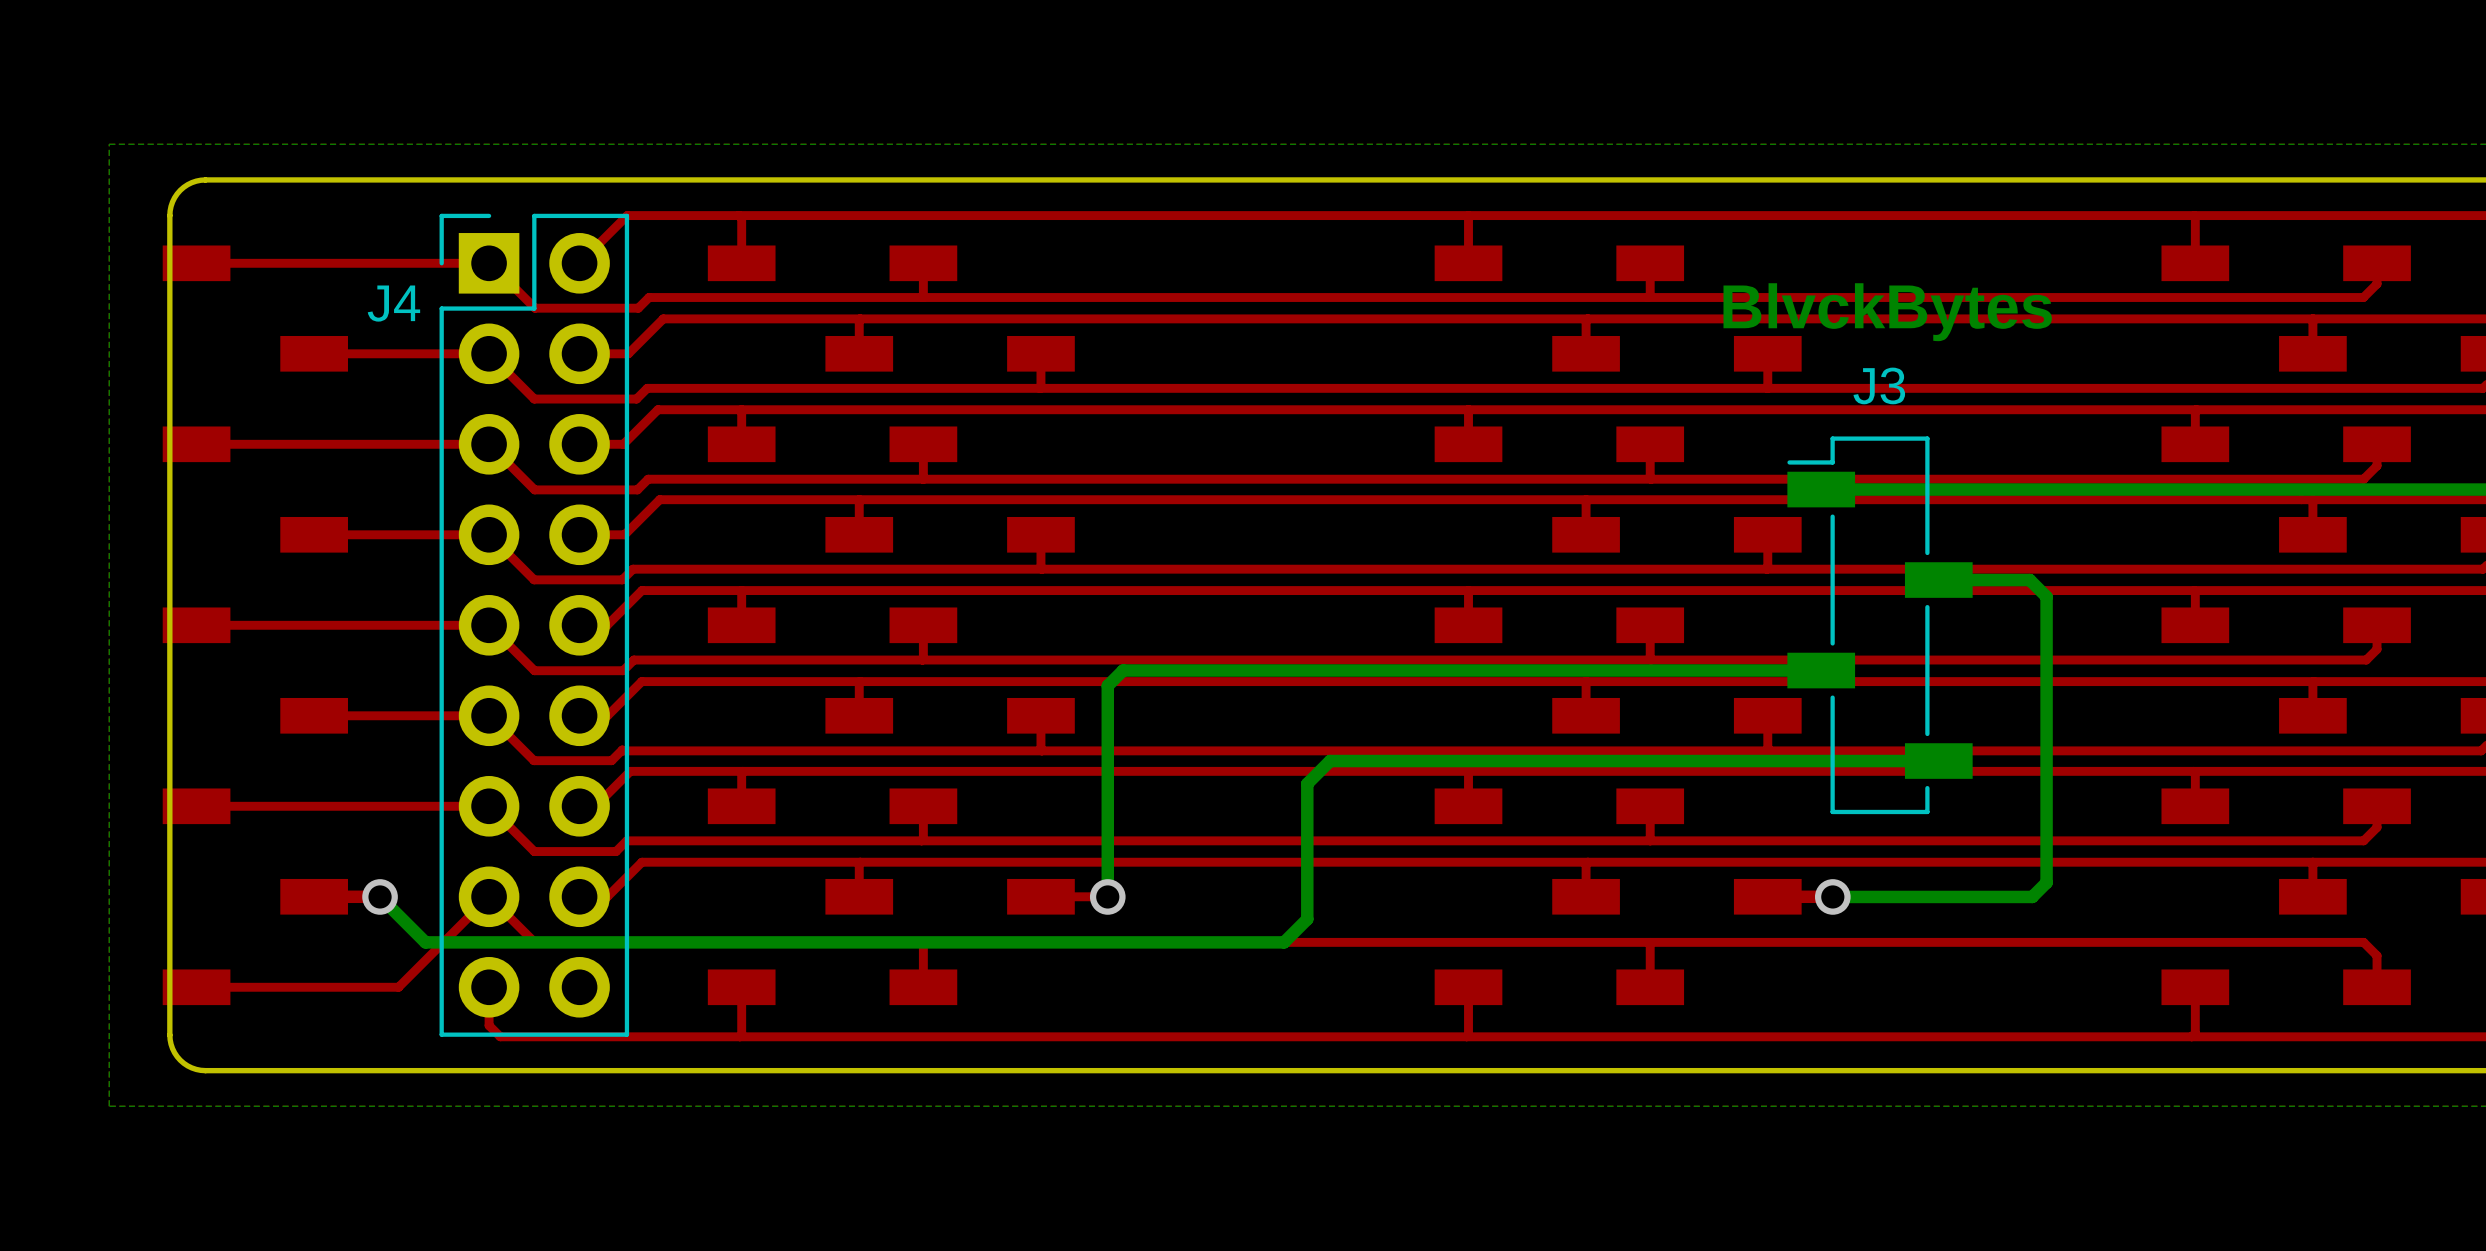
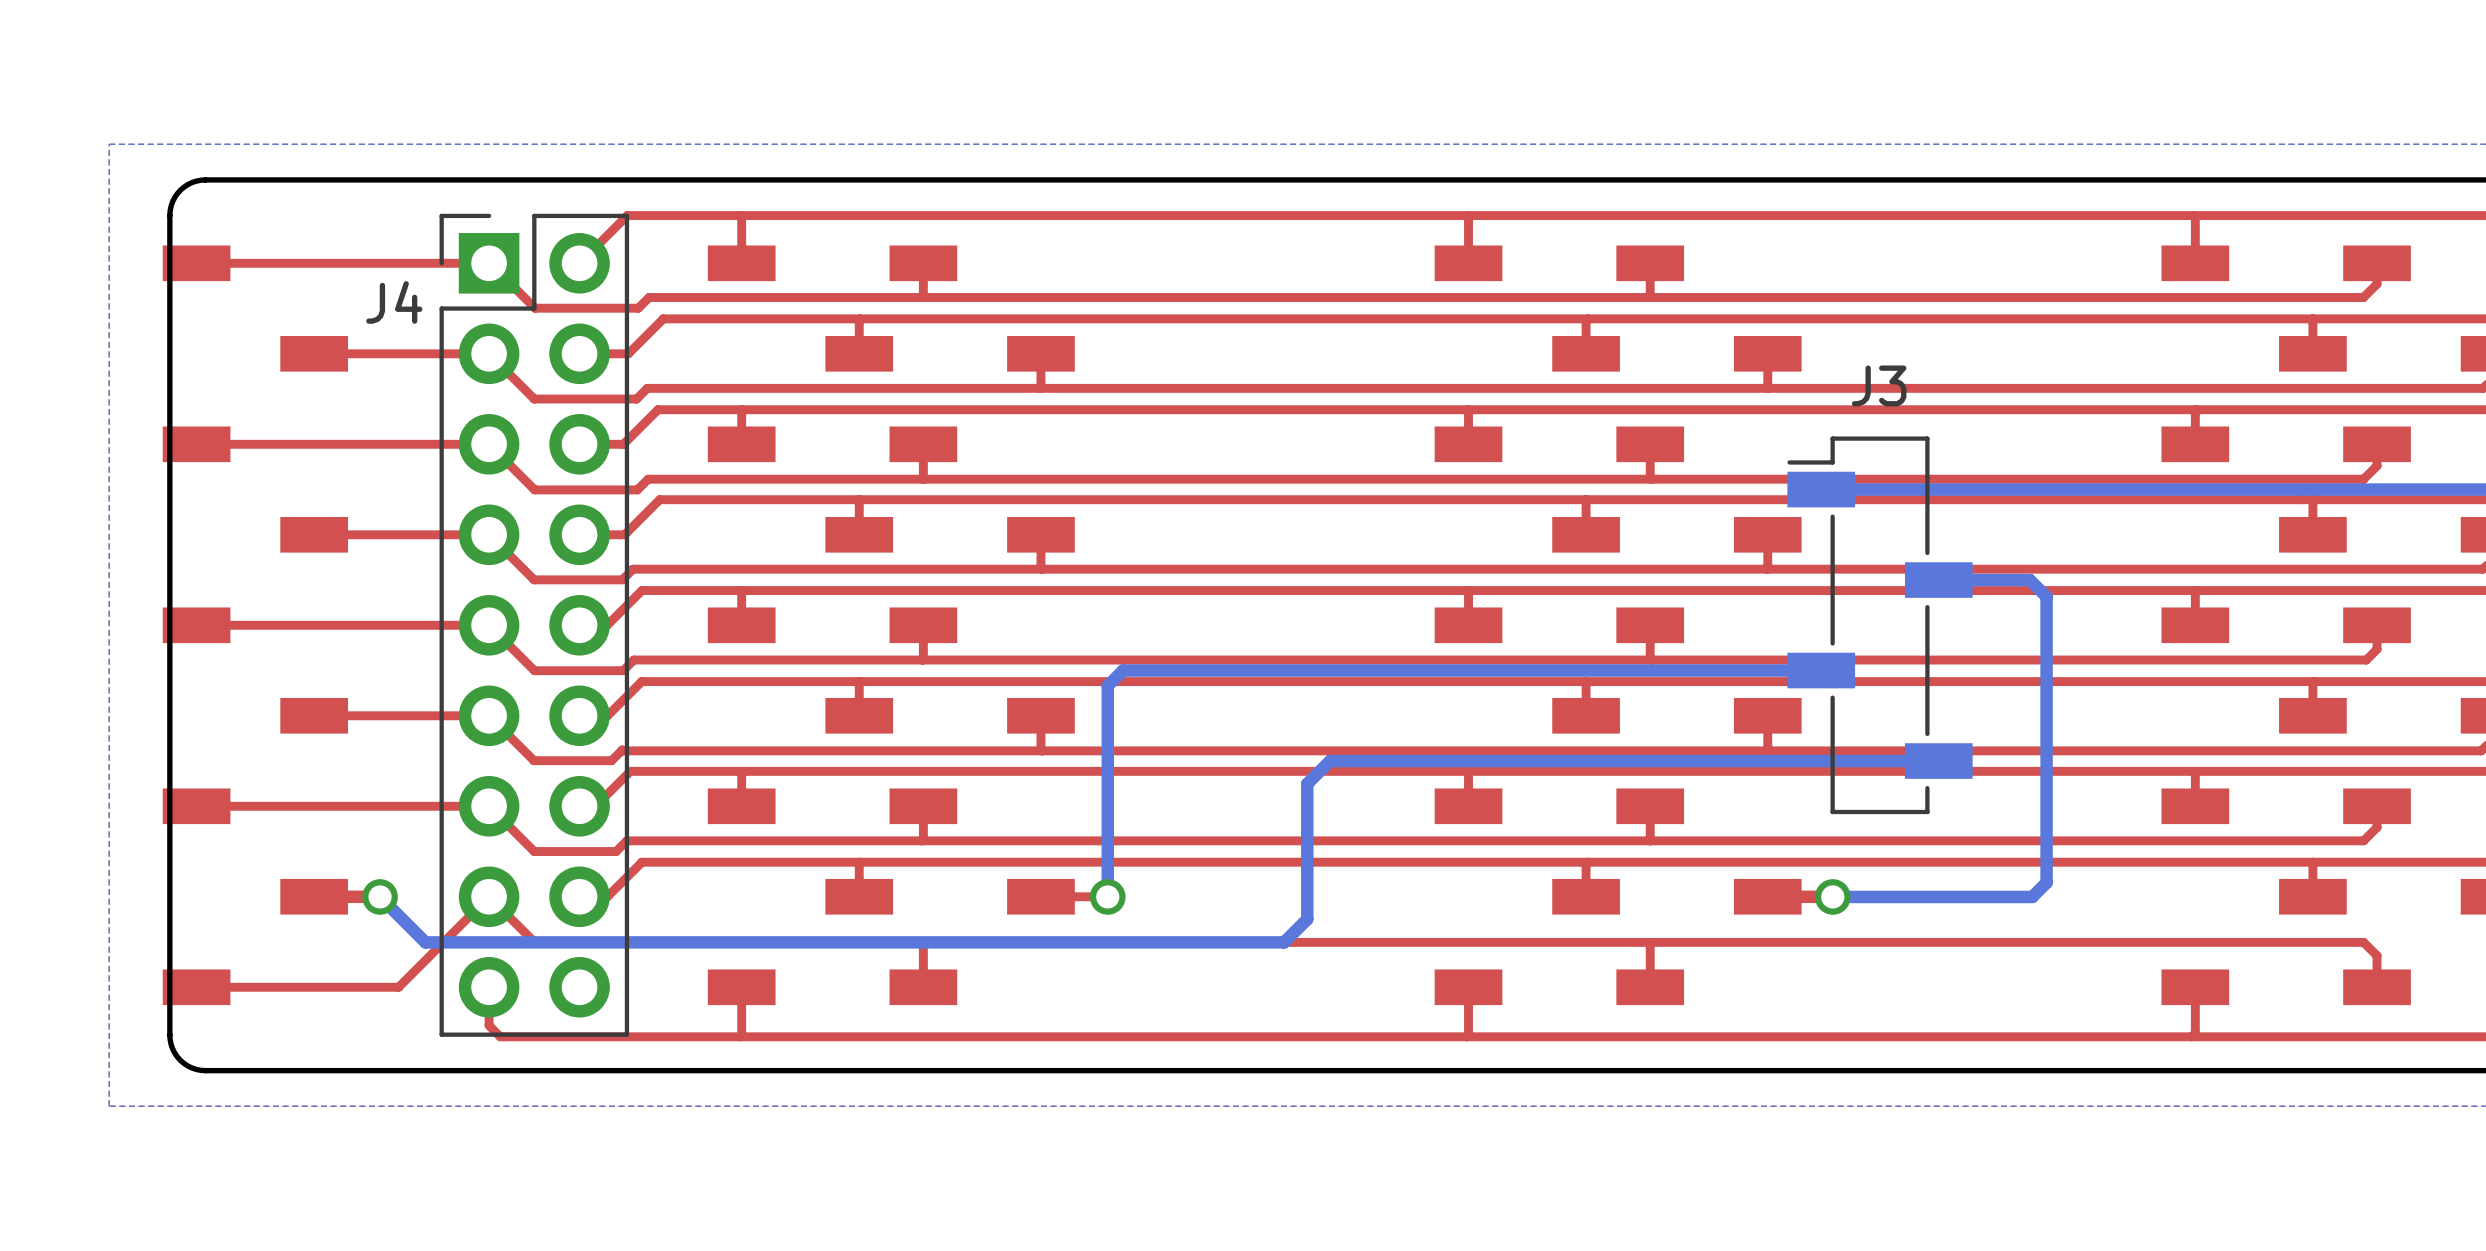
text: BlvckBytes (1887, 312) -> none

